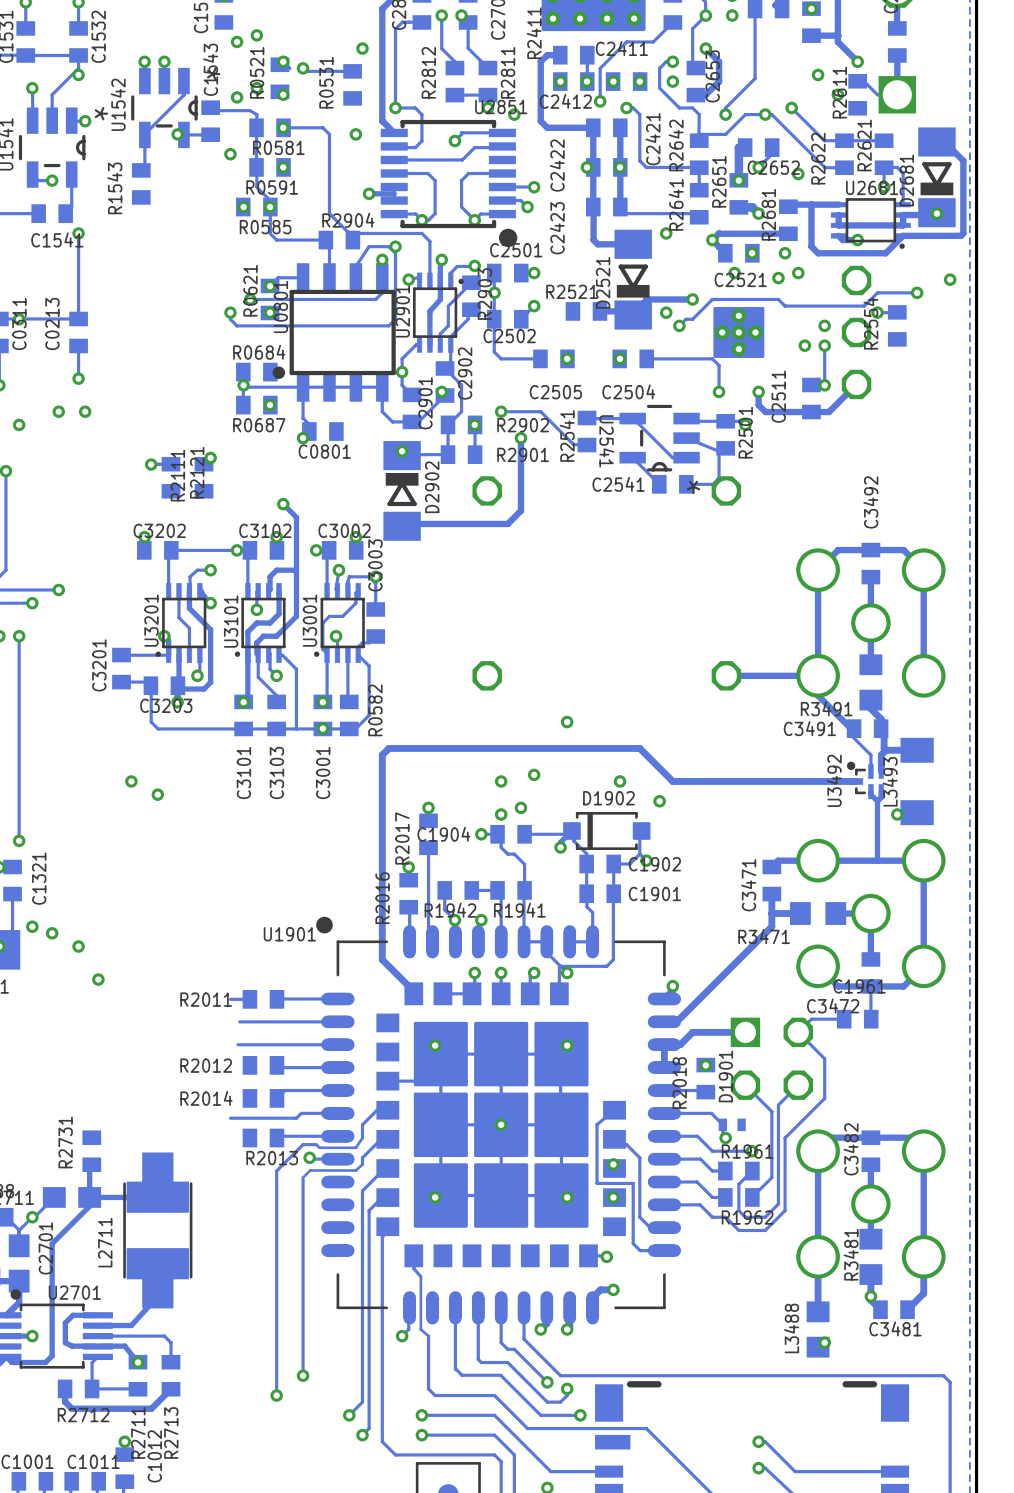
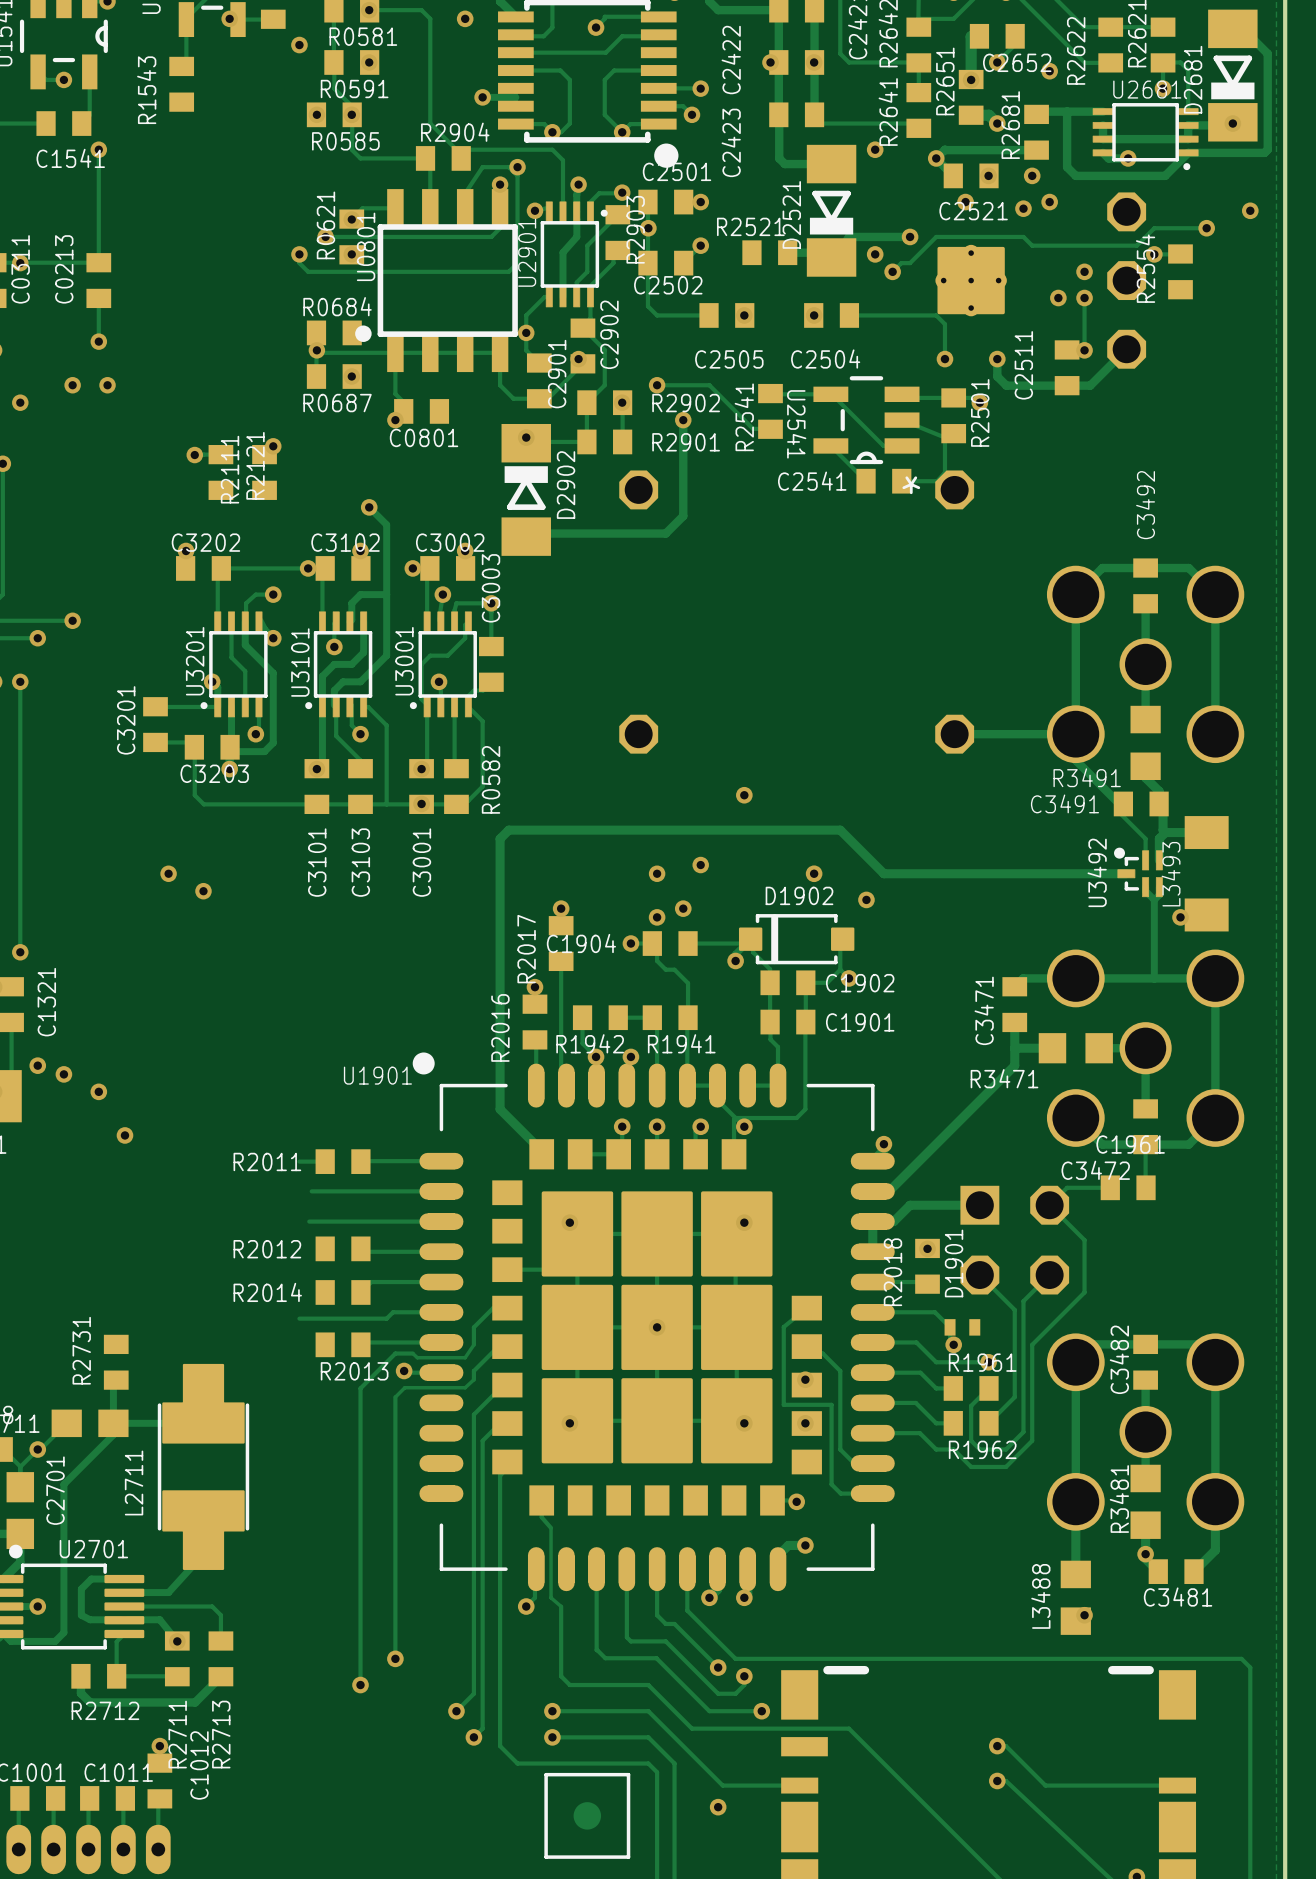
part footprint: [713, 307, 765, 358] -> [935, 244, 1007, 317]

